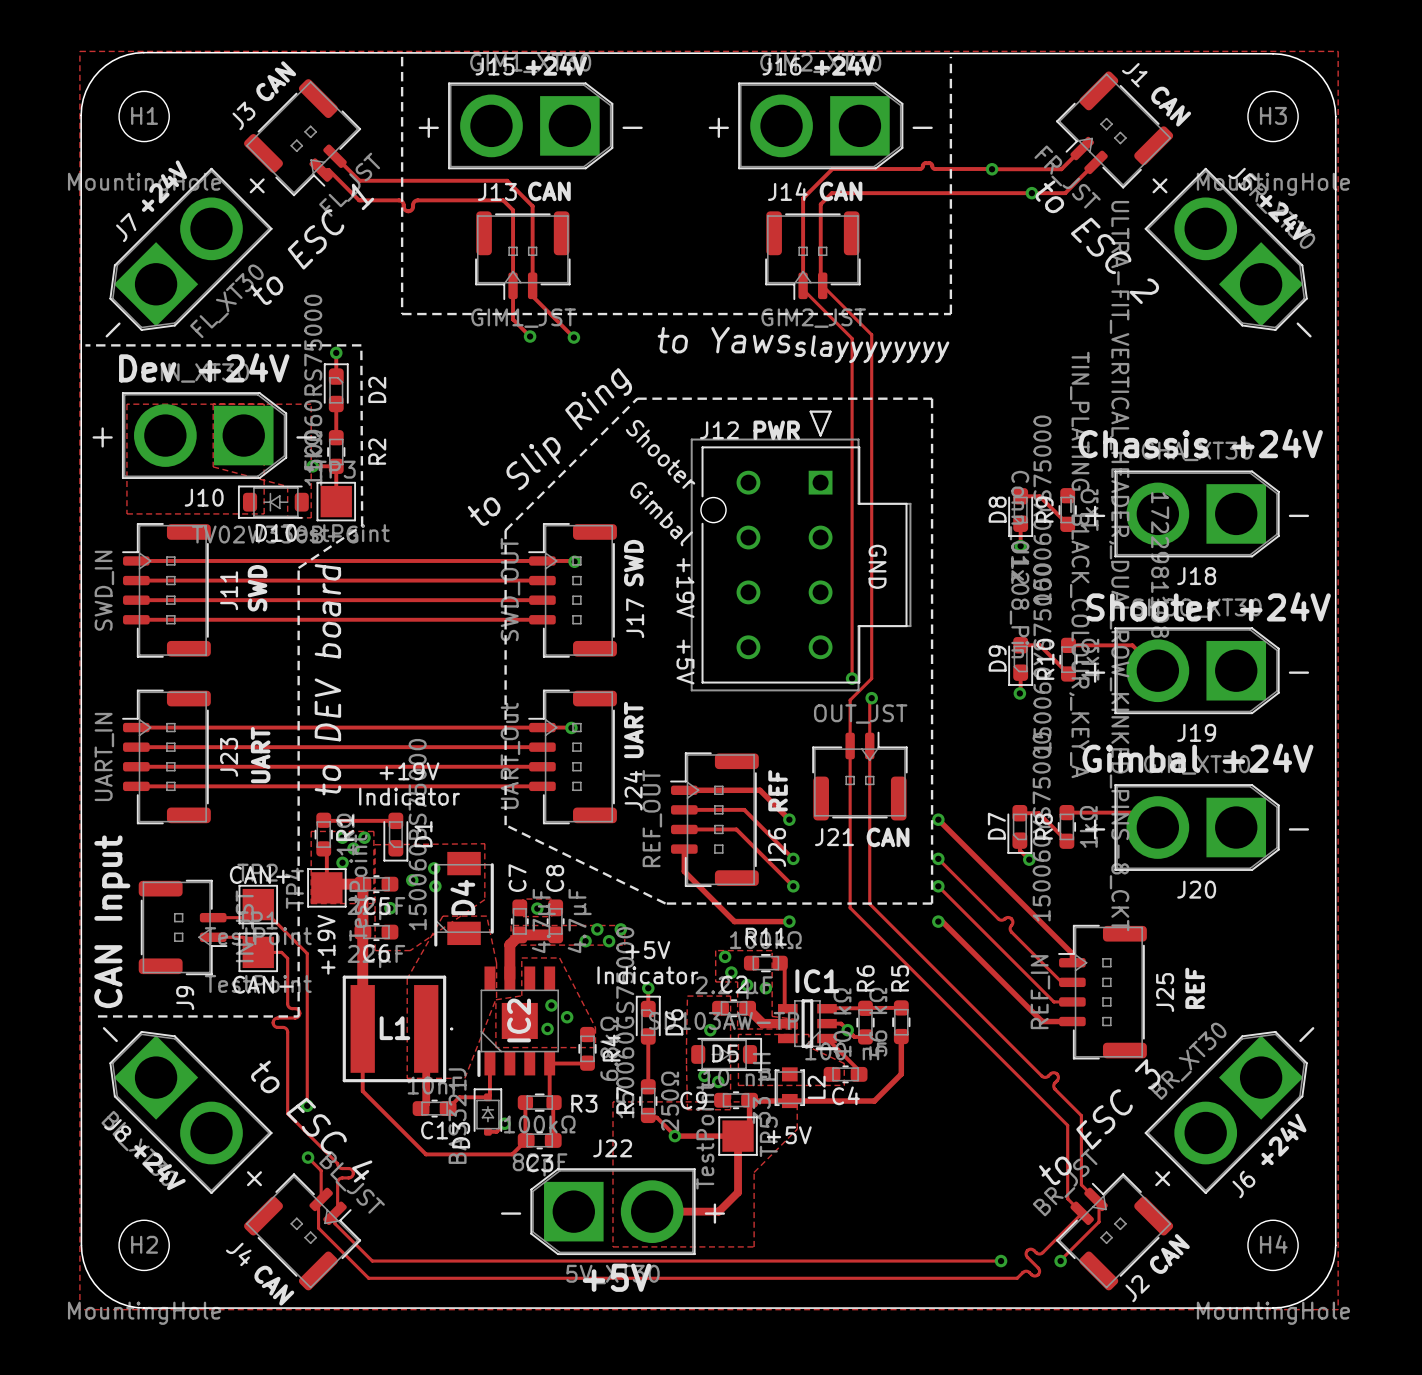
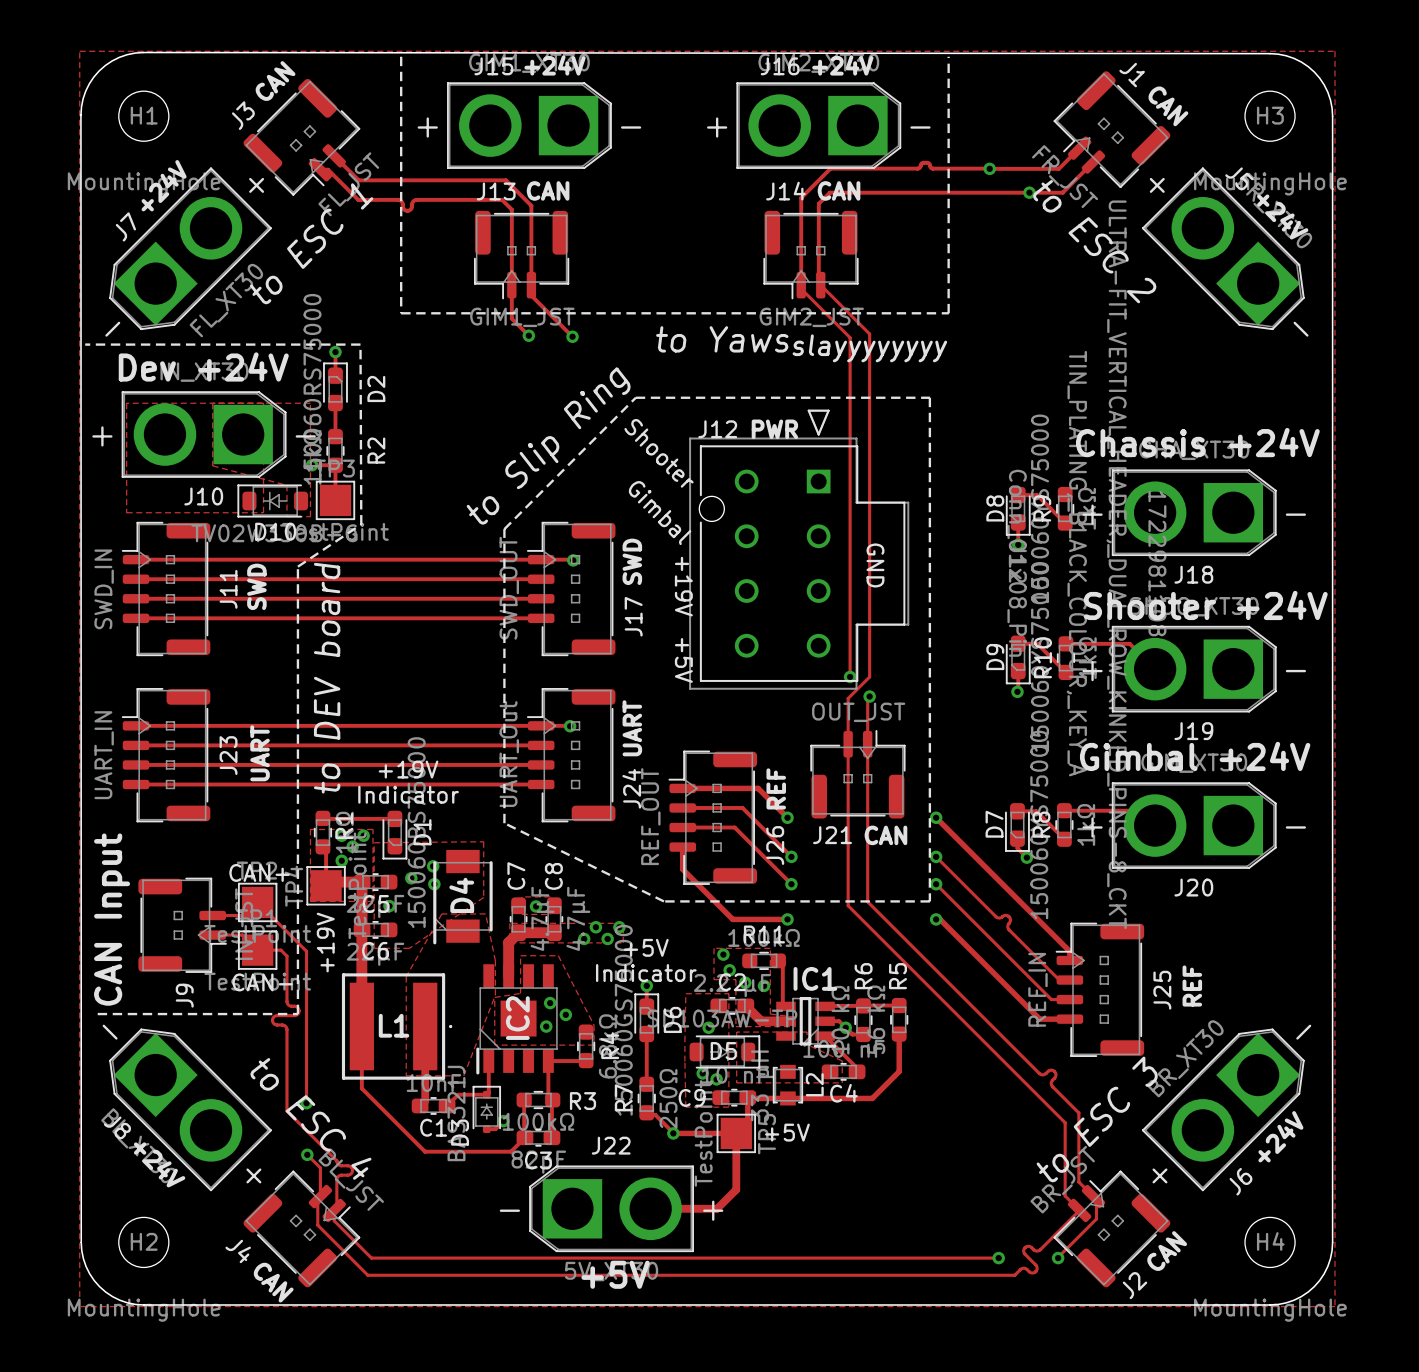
zone outline: (613, 1101) (797, 1101) (797, 1129) (754, 1172) (754, 1246) (613, 1246) (613, 1101) -> none

